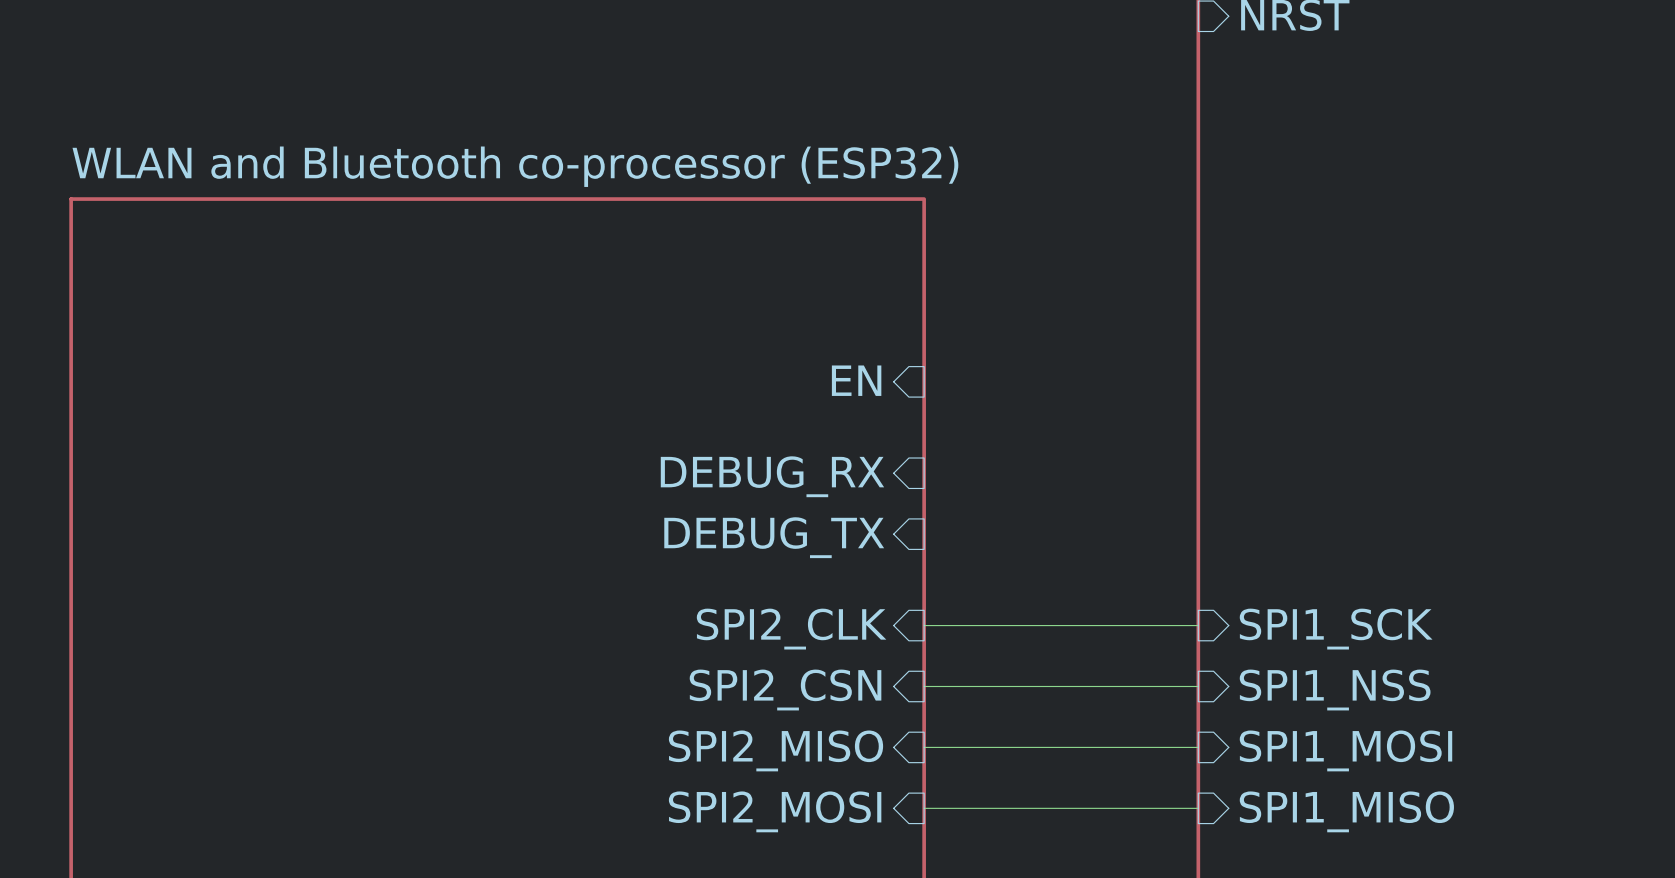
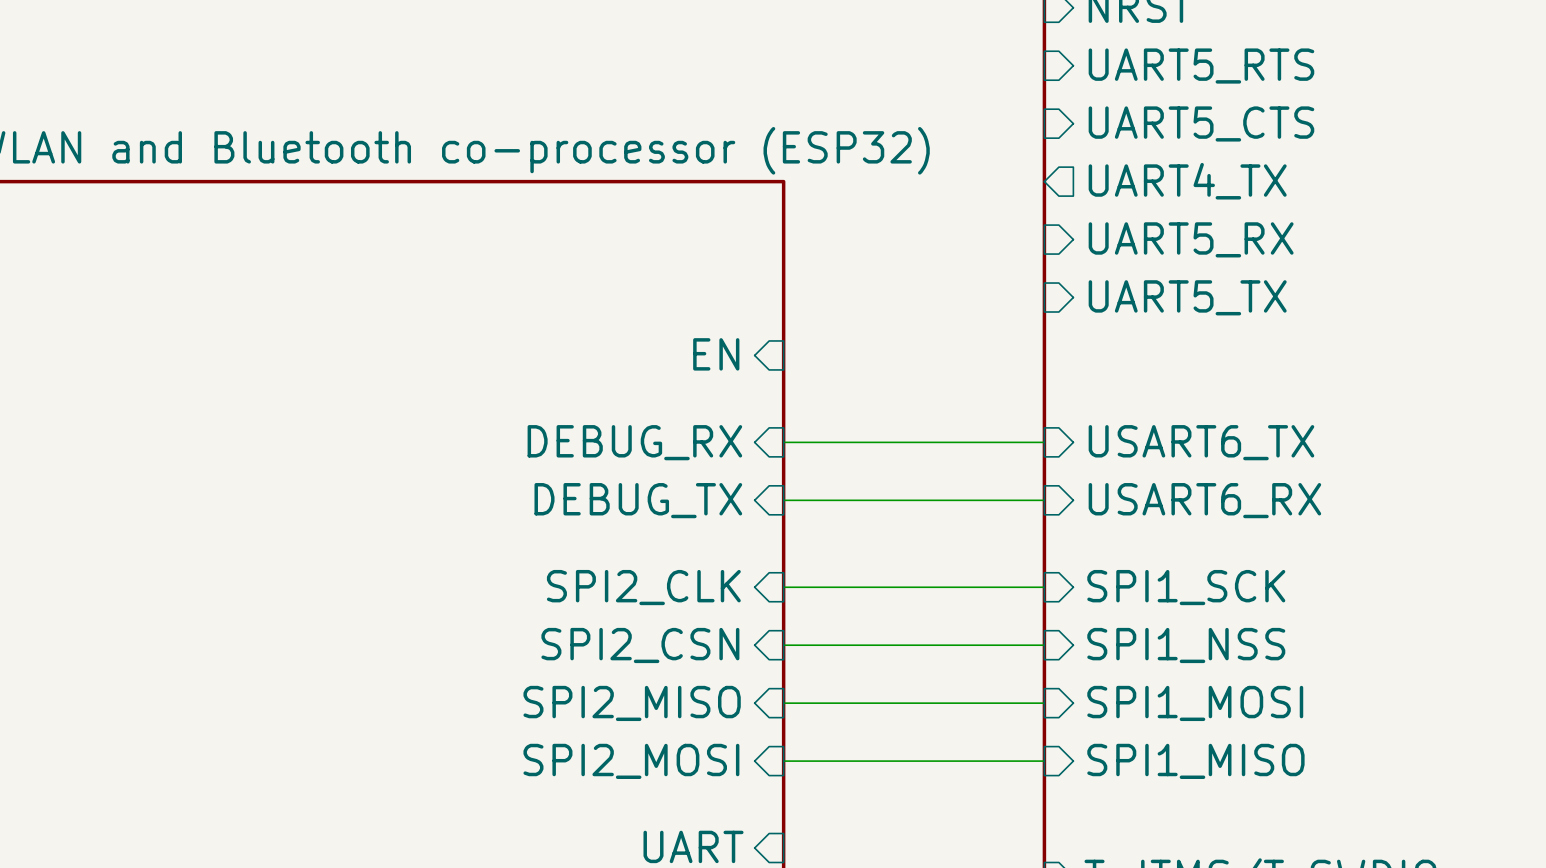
sheet pin: none -> UART5_RTS (1201, 66)
sheet pin: none -> UART5_CTS (1201, 123)
sheet pin: none -> UART4_TX (1187, 181)
sheet pin: none -> UART5_RX (1191, 239)
sheet pin: none -> UART5_TX (1187, 297)
wire: none -> (783, 442) (1044, 442)
sheet pin: none -> USART6_TX (1201, 442)
wire: none -> (783, 500) (1044, 500)
sheet pin: none -> USART6_RX (1204, 500)

